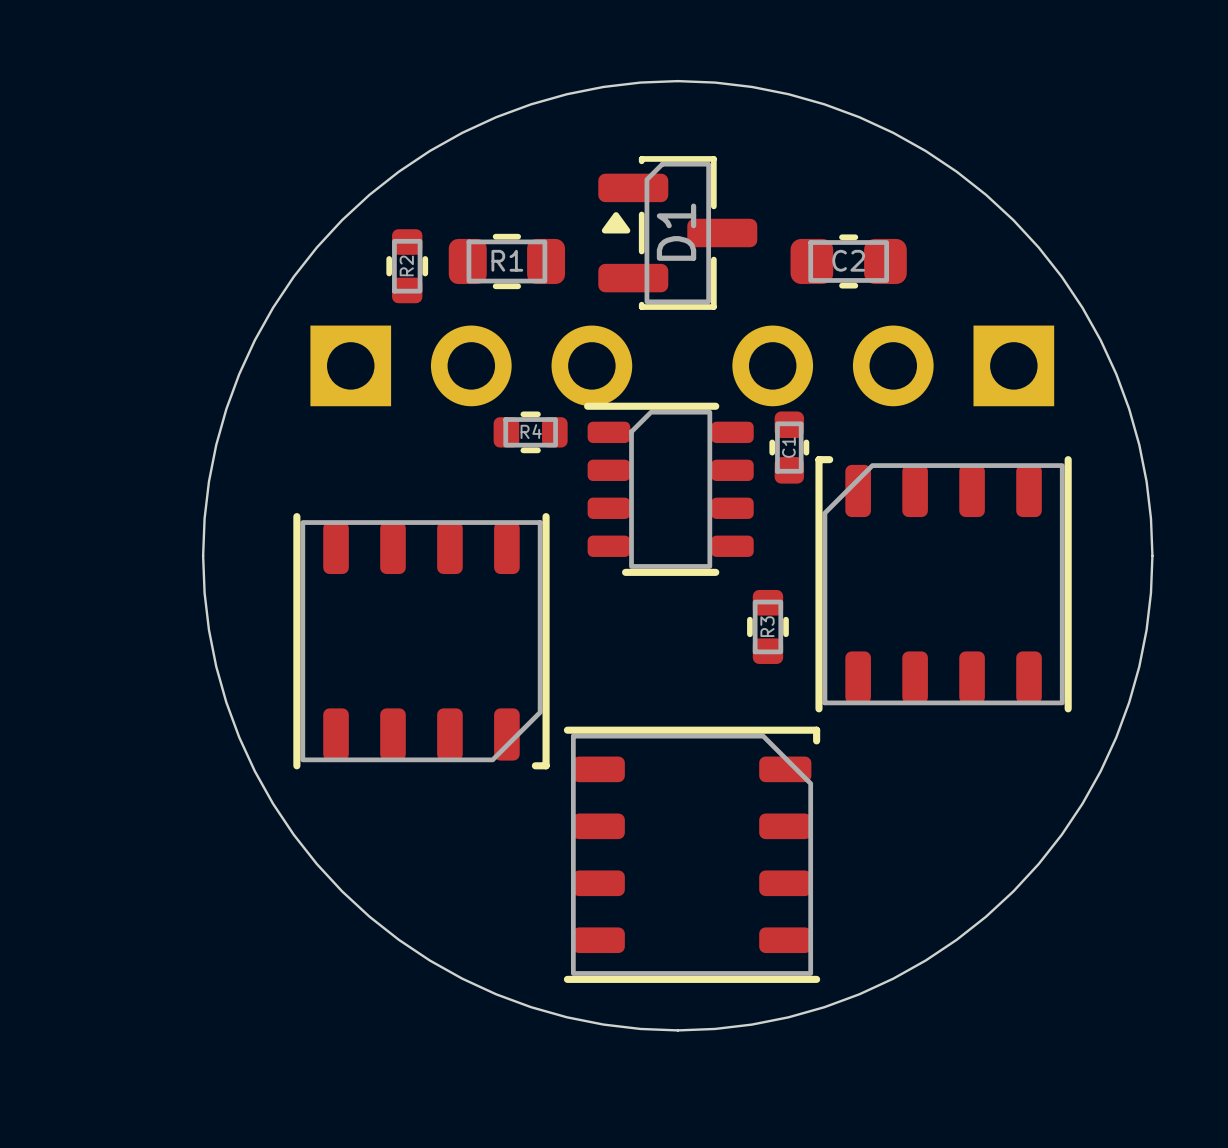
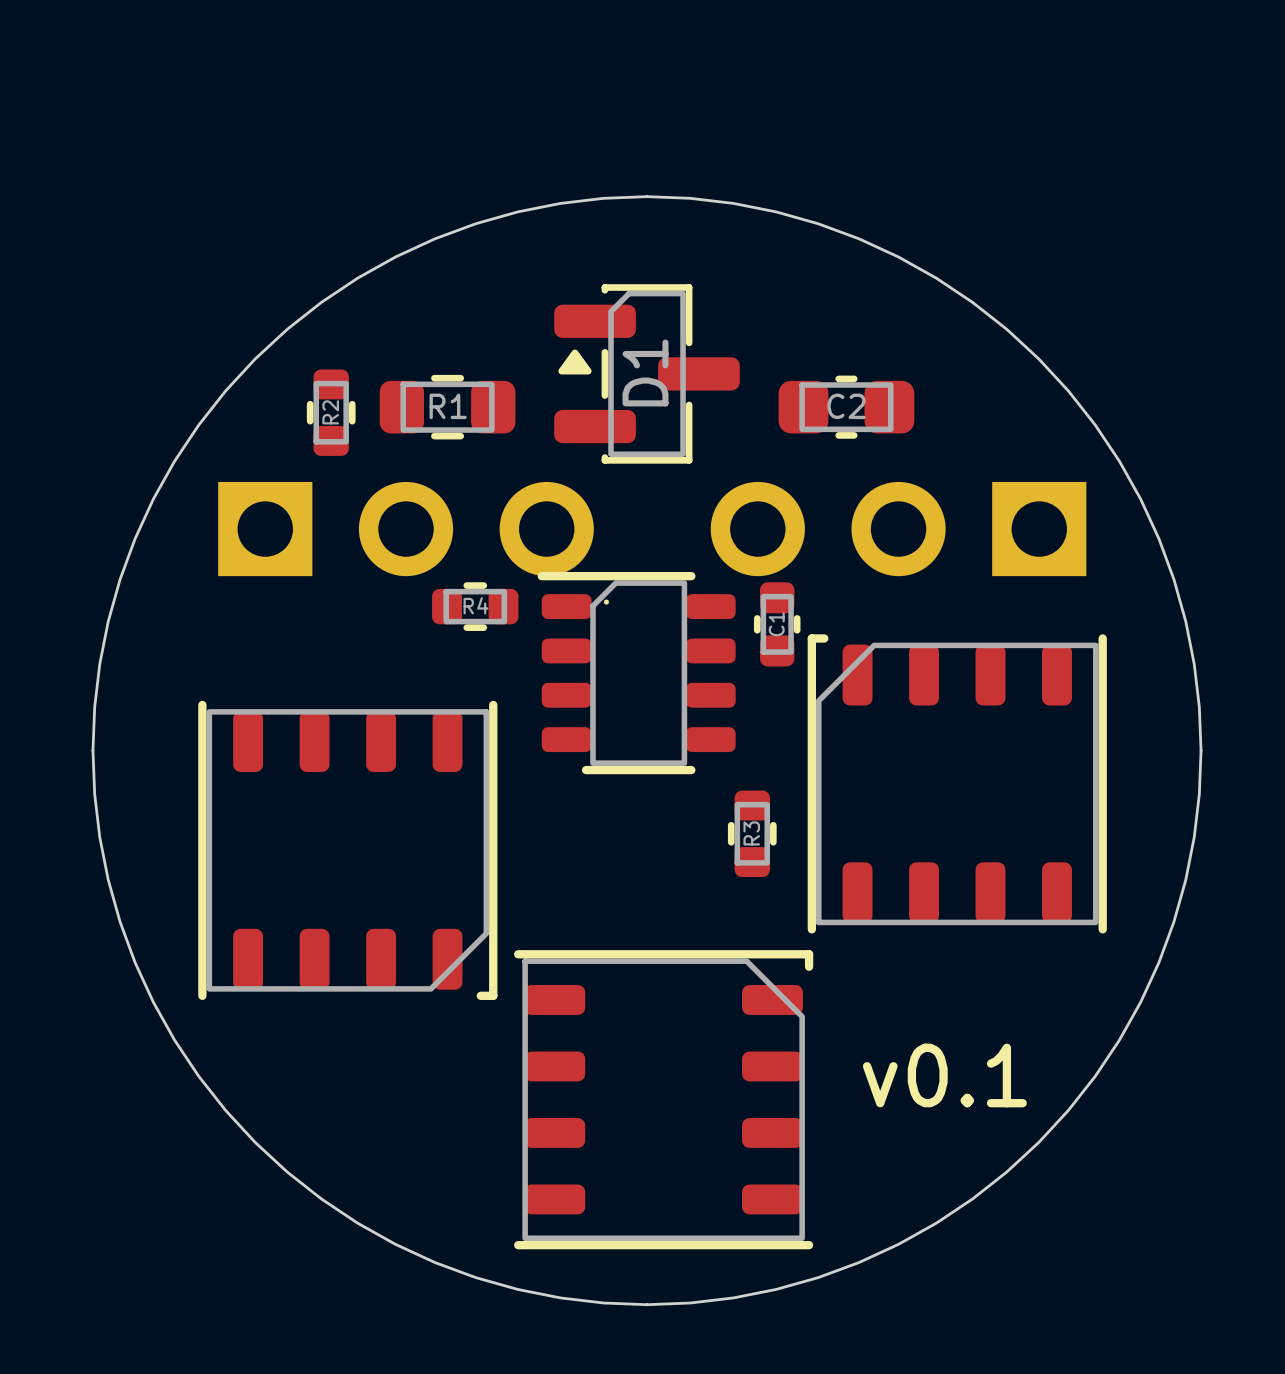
drawing: none -> [603, 599, 610, 605]
text: none -> v0.1 (944, 1075)

